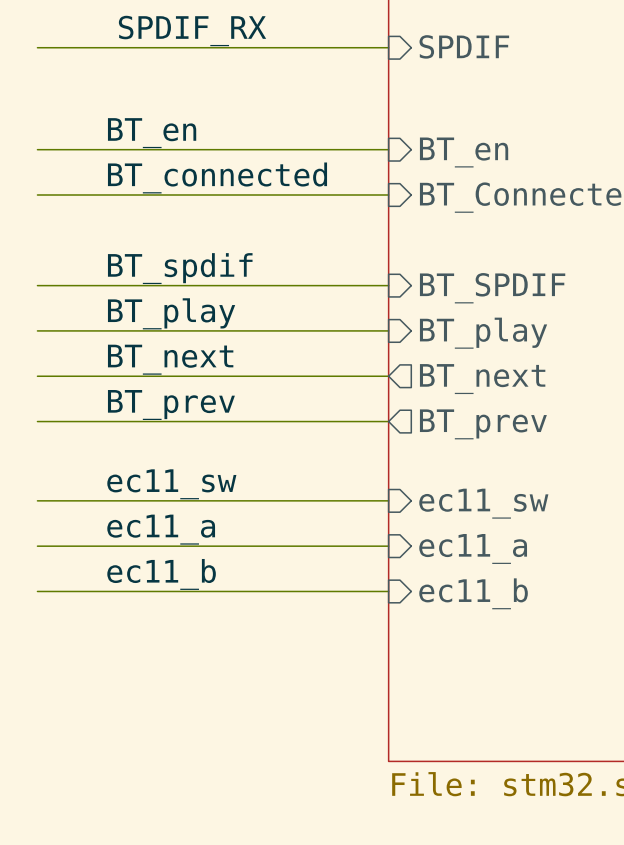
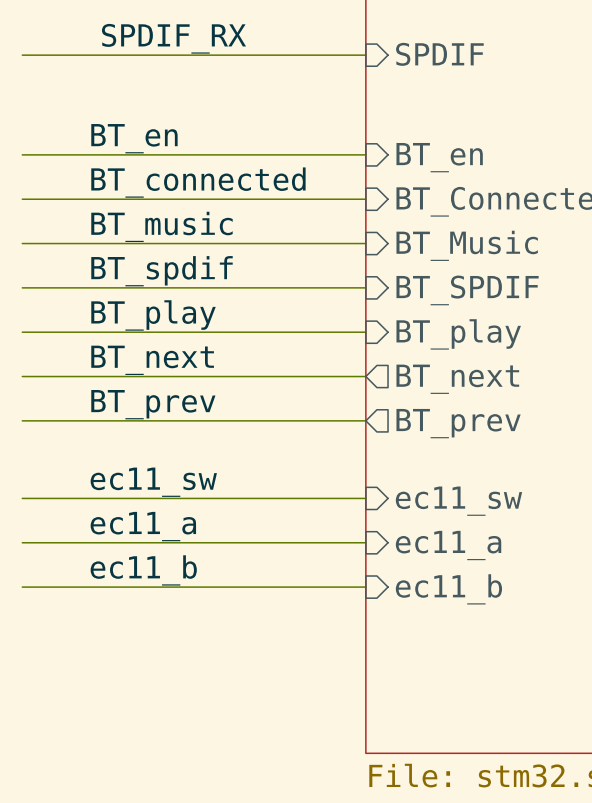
label: none -> BT_music (161, 226)
wire: none -> (22, 243) (365, 243)
sheet pin: none -> BT_Music (467, 245)

